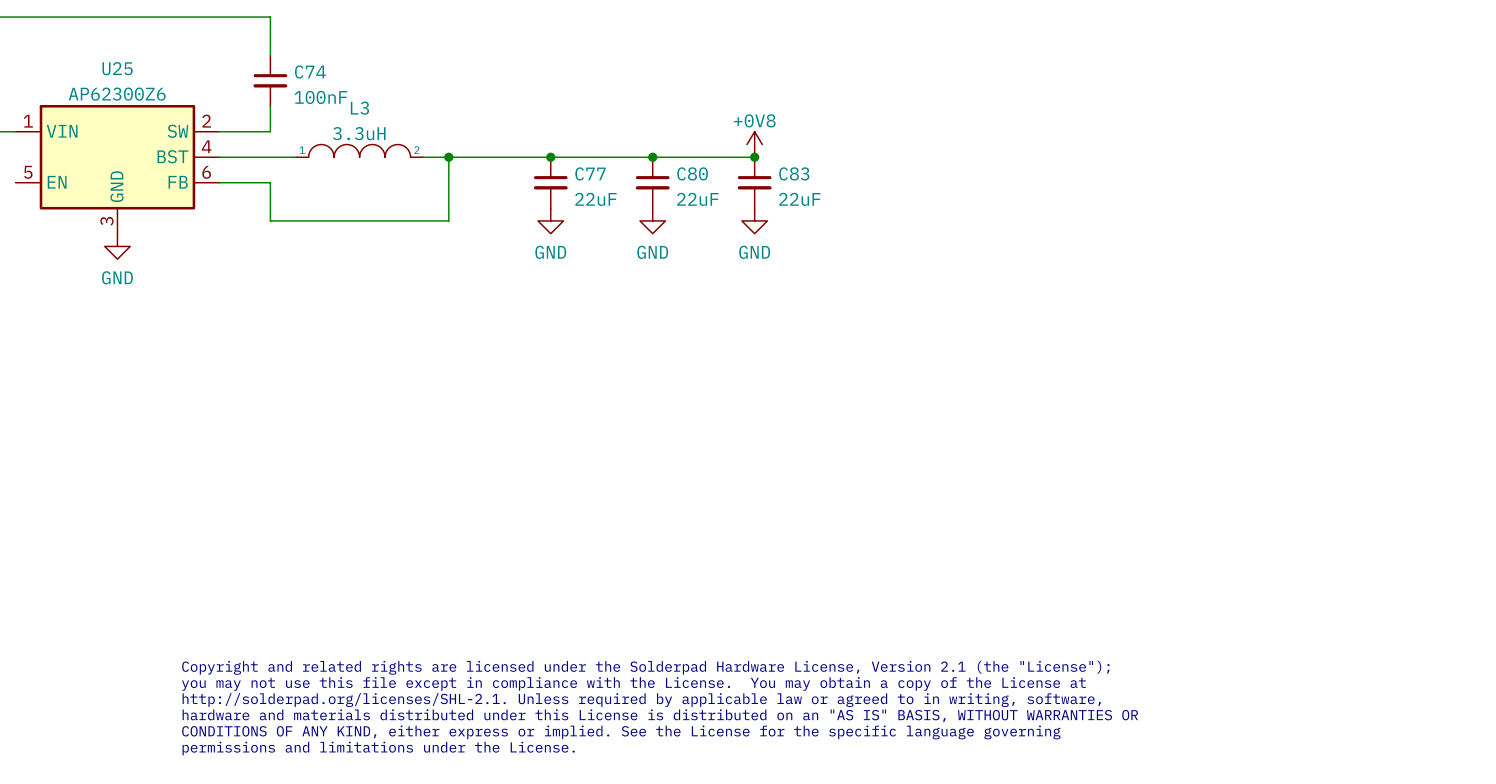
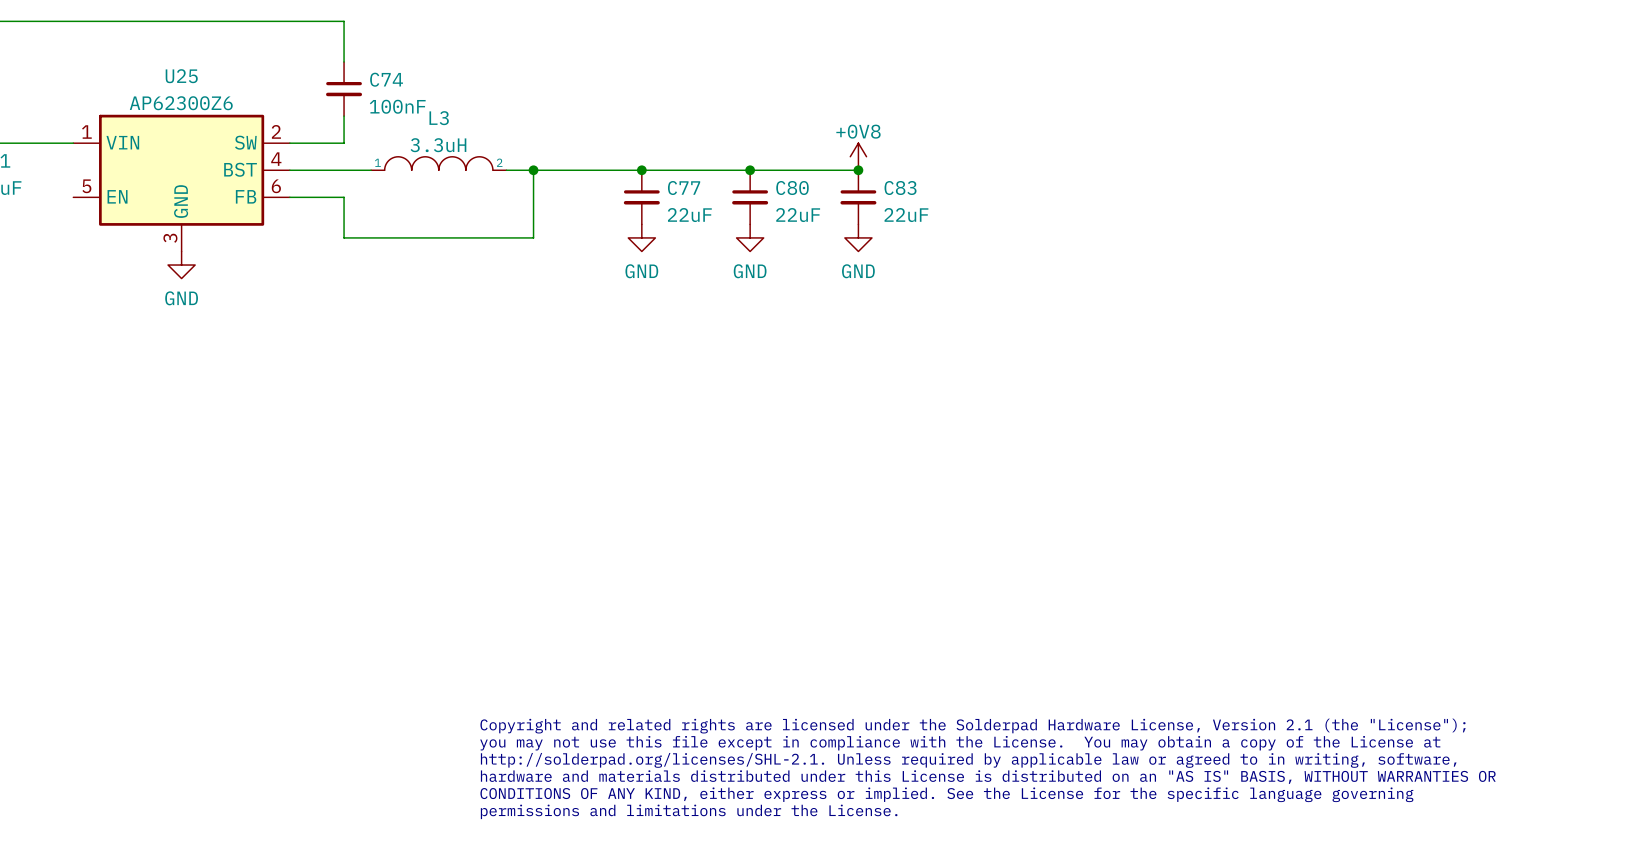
text position: Copyright and related rights are licensed under the Solderpad Hardware License, Version 2.1 (the "License"); (645, 667) -> Copyright and related rights are licensed under the Solderpad Hardware License, Version 2.1 (the "License"); (973, 726)
text position: you may not use this file except in compliance with the License. You may obtain a copy of the License at (633, 683) -> you may not use this file except in compliance with the License. You may obtain a copy of the License at (960, 743)
text position: http://solderpad.org/licenses/SHL-2.1. Unless required by applicable law or agreed to in writing, software, (641, 700) -> http://solderpad.org/licenses/SHL-2.1. Unless required by applicable law or agreed to in writing, software, (968, 760)
text position: hardware and materials distributed under this License is distributed on an "AS IS" BASIS, WITHOUT WARRANTIES OR (660, 715) -> hardware and materials distributed under this License is distributed on an "AS IS" BASIS, WITHOUT WARRANTIES OR (988, 777)
text position: CONDITIONS OF ANY KIND, either express or implied. See the License for the specific language governing (621, 732) -> CONDITIONS OF ANY KIND, either express or implied. See the License for the specific language governing (946, 794)
text position: permissions and limitations under the License. (378, 748) -> permissions and limitations under the License. (689, 811)

